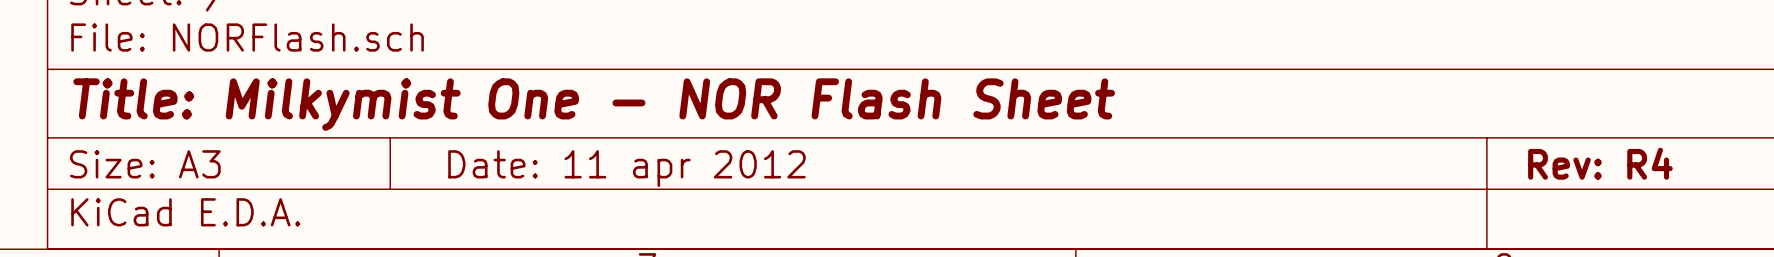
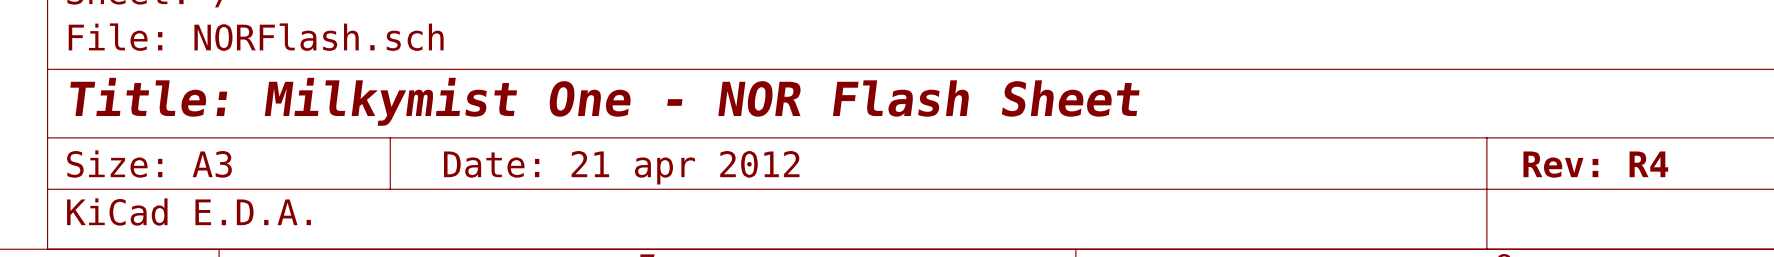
title block: Date: 11 apr 2012 (626, 168) -> Date: 21 apr 2012 (621, 167)

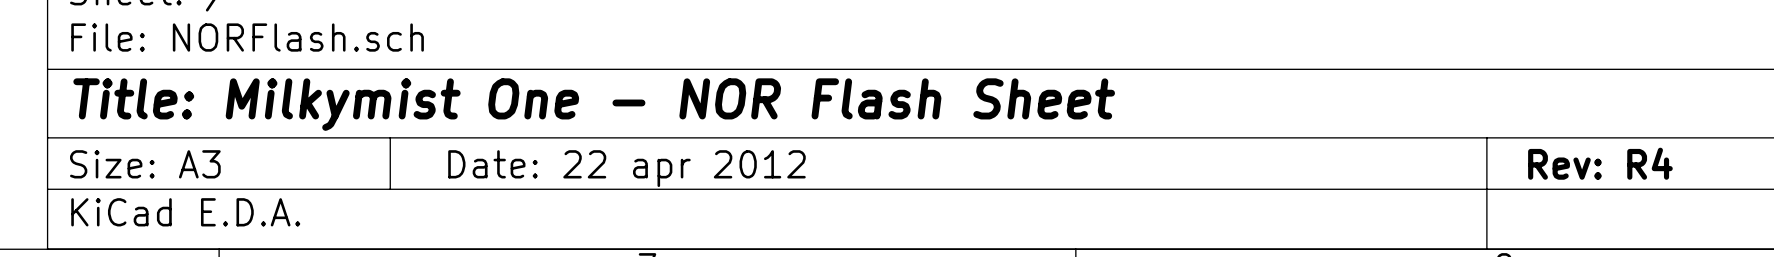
title block: Date: 21 apr 2012 (621, 167) -> Date: 22 apr 2012 (626, 168)

